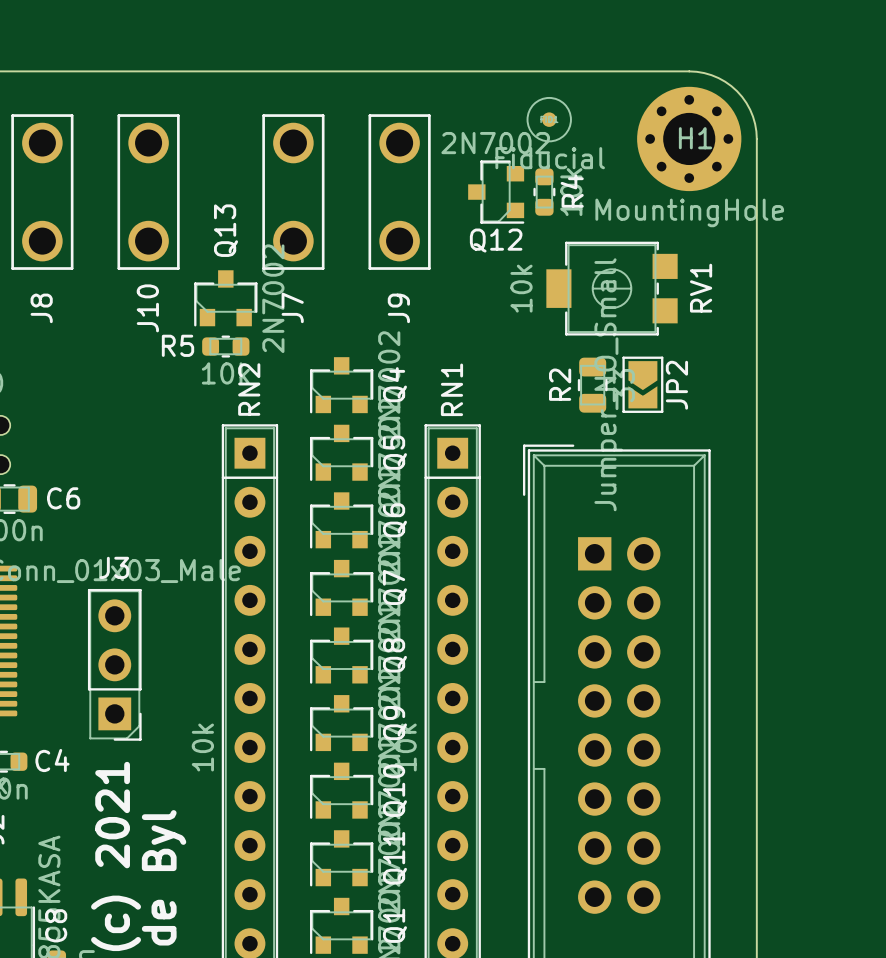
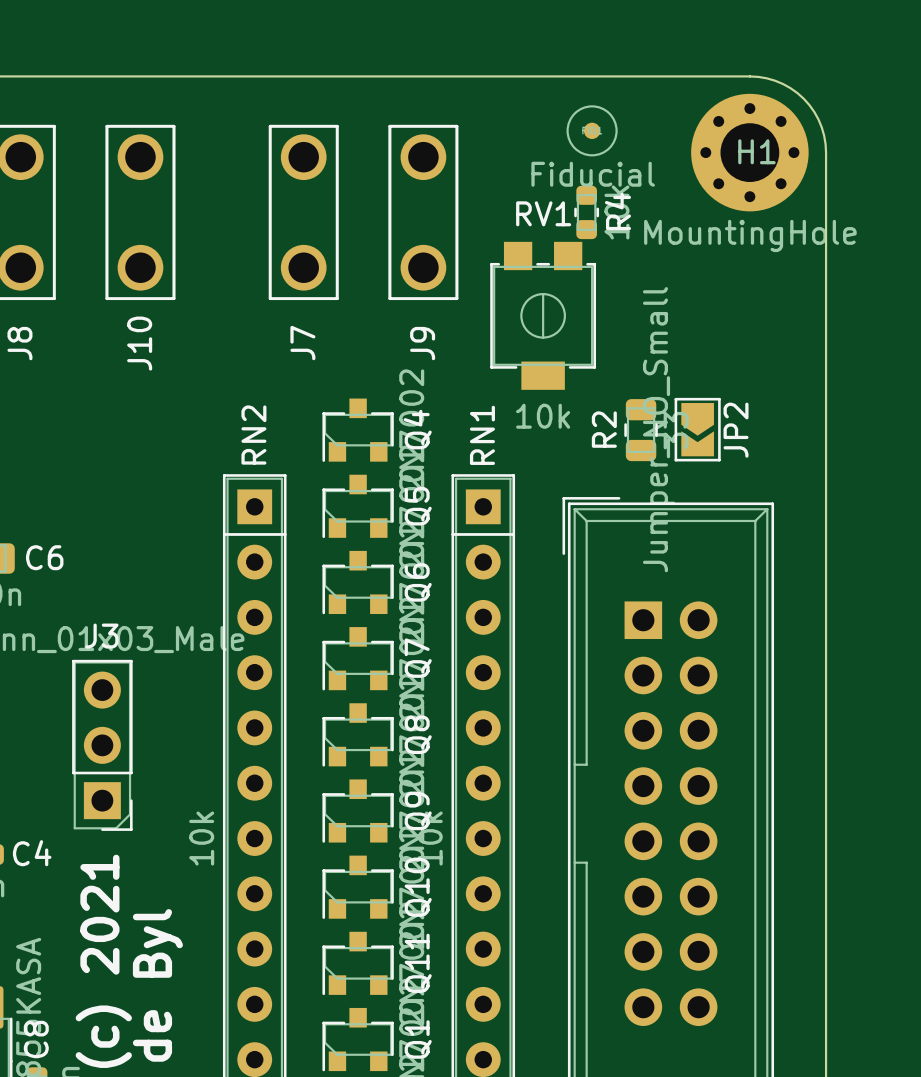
Q12: 2N7002 (496, 192) -> none
RV1 rotation: 0° (612, 288) -> 90° counterclockwise (543, 315)
RV1 position: (612, 288) -> (543, 315)
Q13: 2N7002 (225, 298) -> none
R5: 10k (225, 346) -> none

